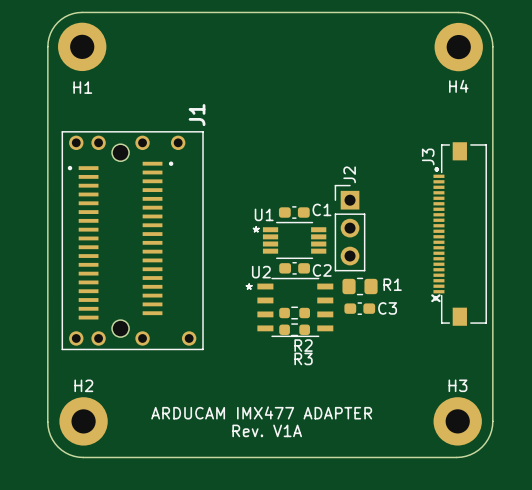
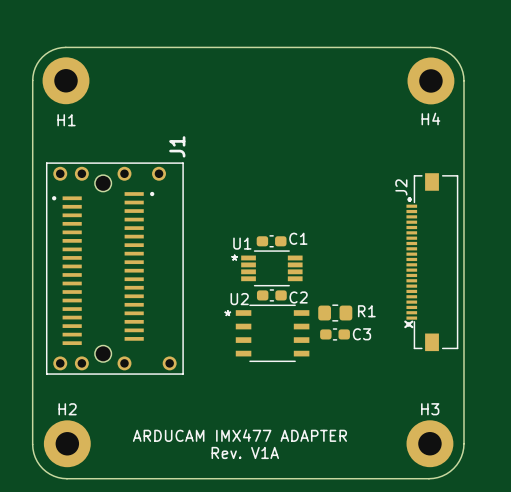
J3 name: J3 (428, 156) -> J2 (401, 187)
J2: (350, 228) -> none
R2: (294, 313) -> none
R3: (294, 329) -> none

